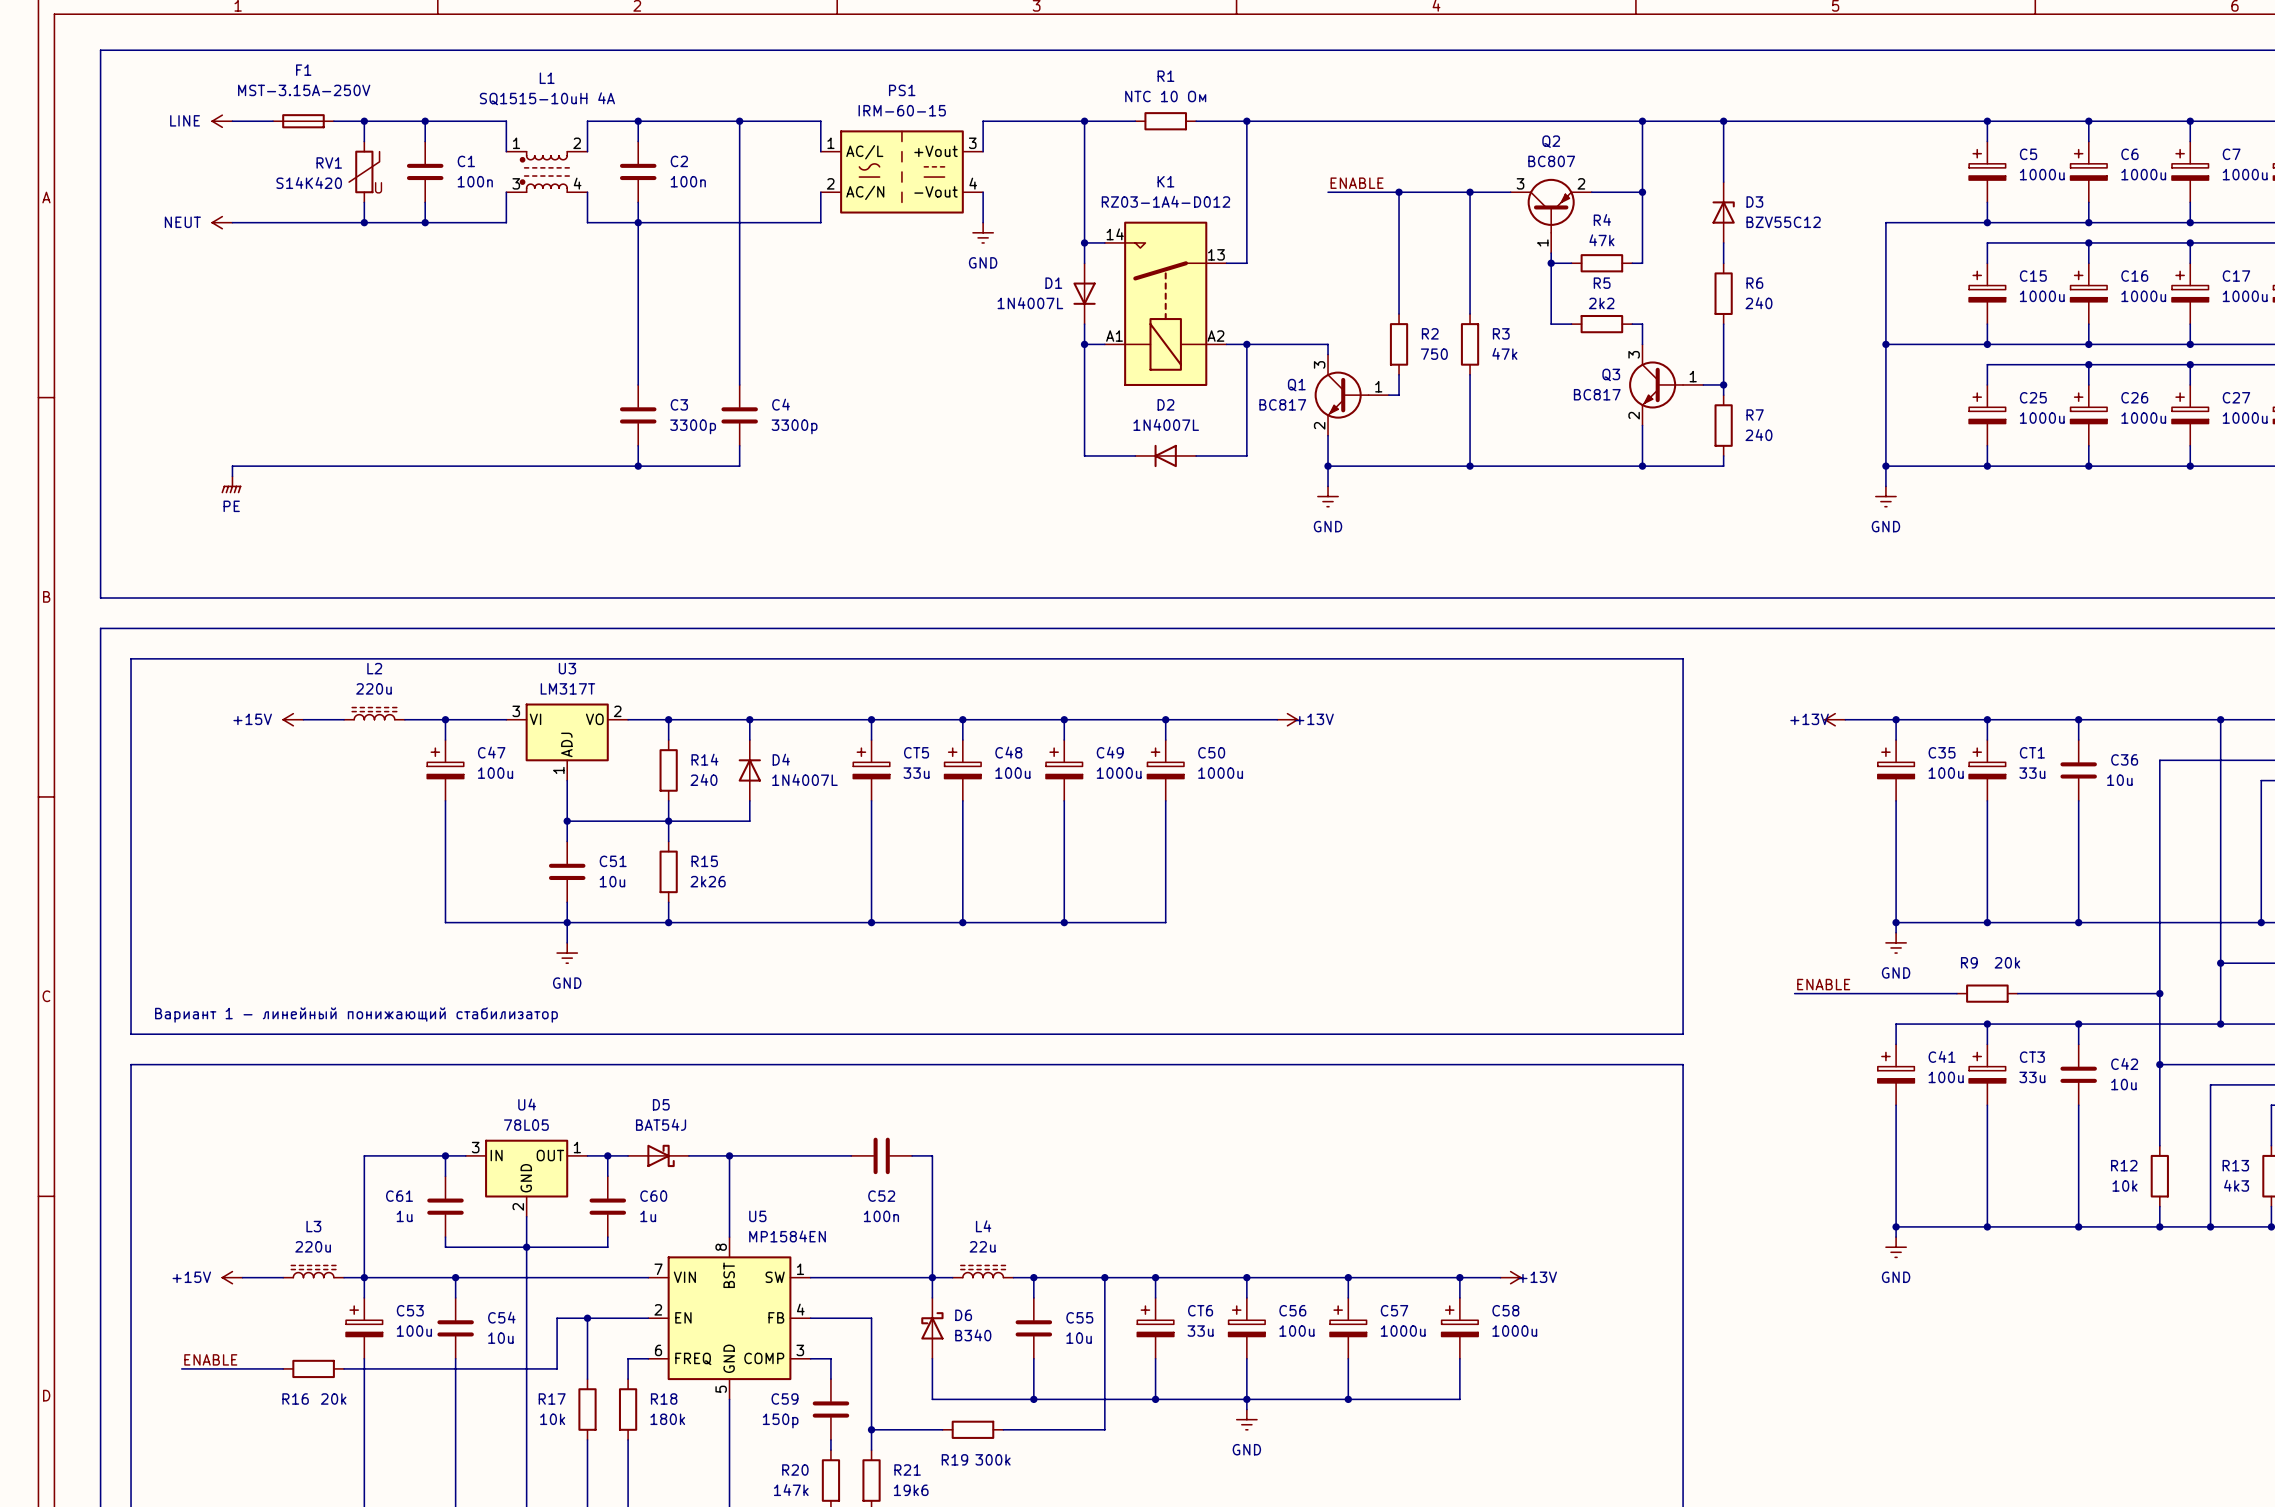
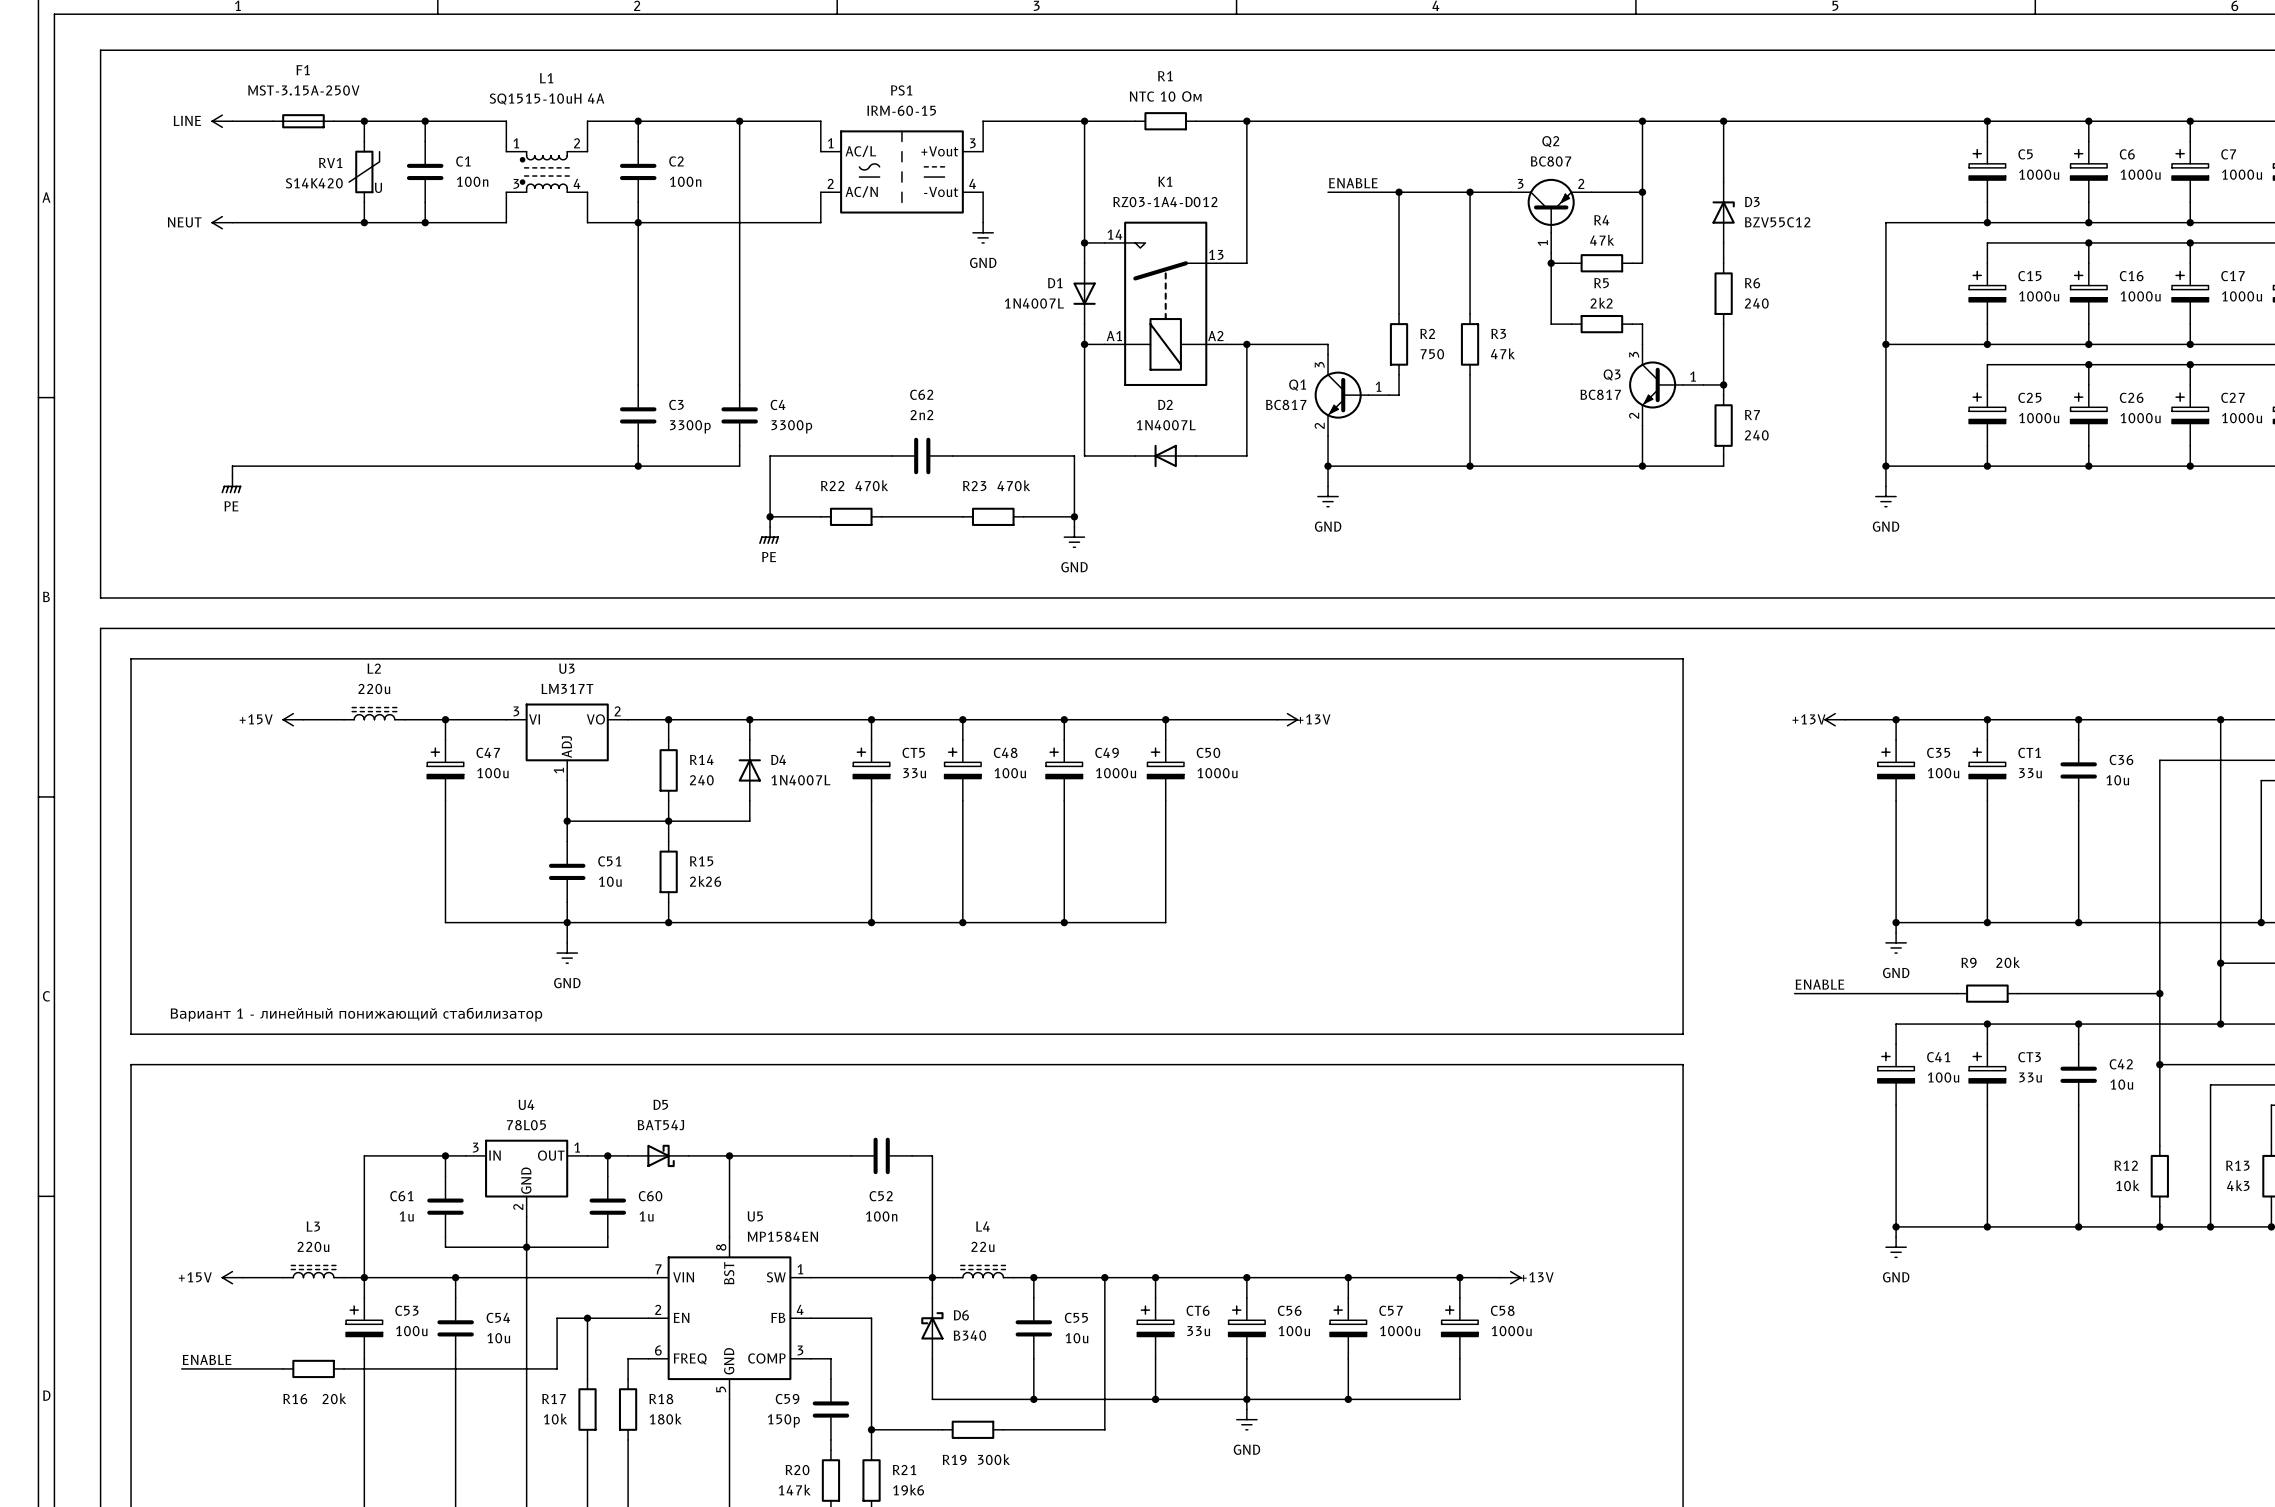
wire: none -> (891, 455) (770, 455) (770, 526)
C62: none -> 2n2 (922, 455)
wire: none -> (952, 455) (1074, 455) (1074, 526)
wire: none -> (770, 516) (820, 516)
junction: none -> (770, 516)
R22: none -> 470k (851, 516)
wire: none -> (881, 516) (962, 516)
R23: none -> 470k (993, 516)
wire: none -> (1023, 516) (1074, 516)
junction: none -> (1074, 516)
power symbol: none -> PE (769, 535)
power symbol: none -> GND (1074, 537)

